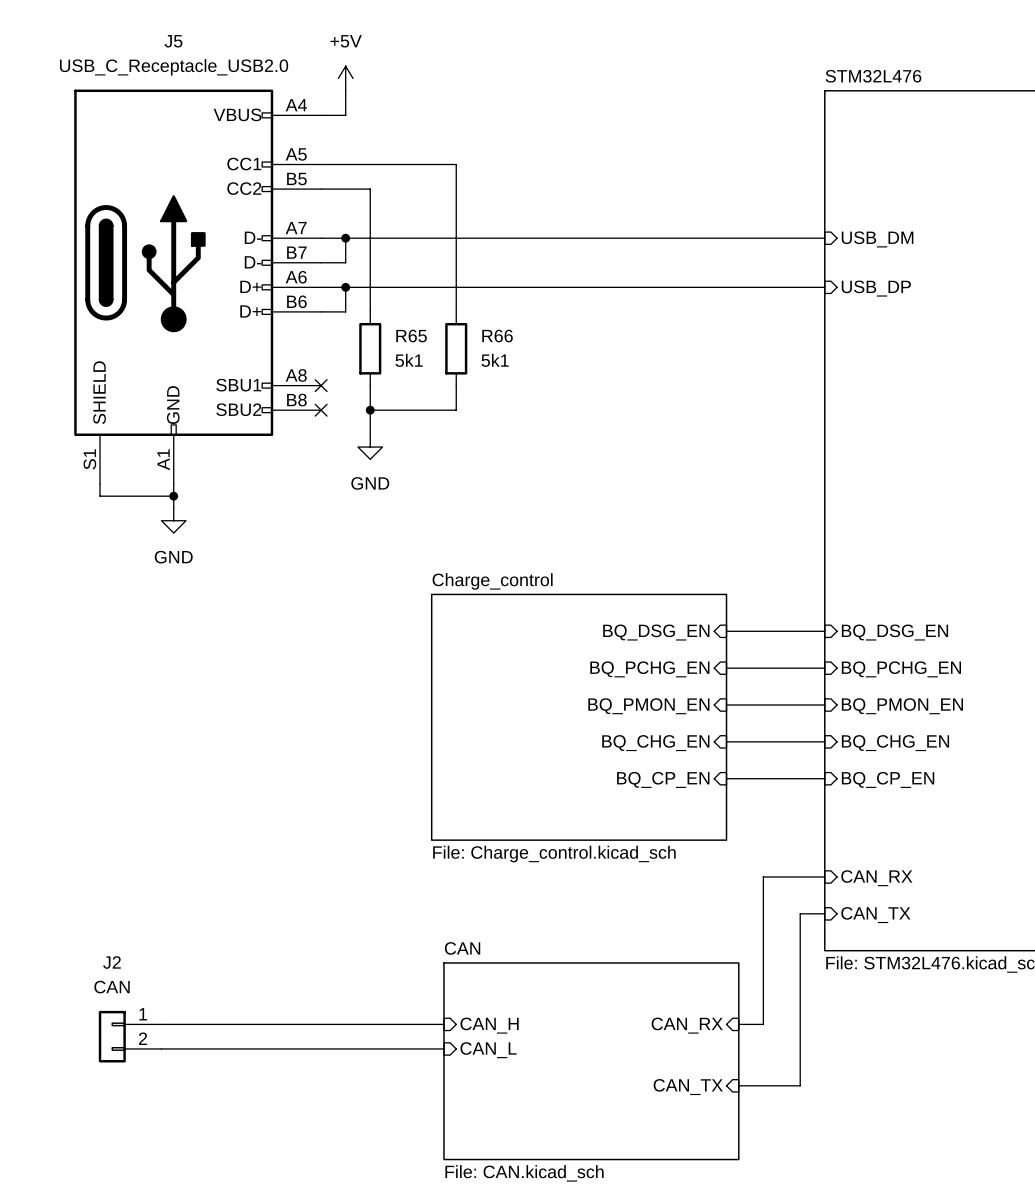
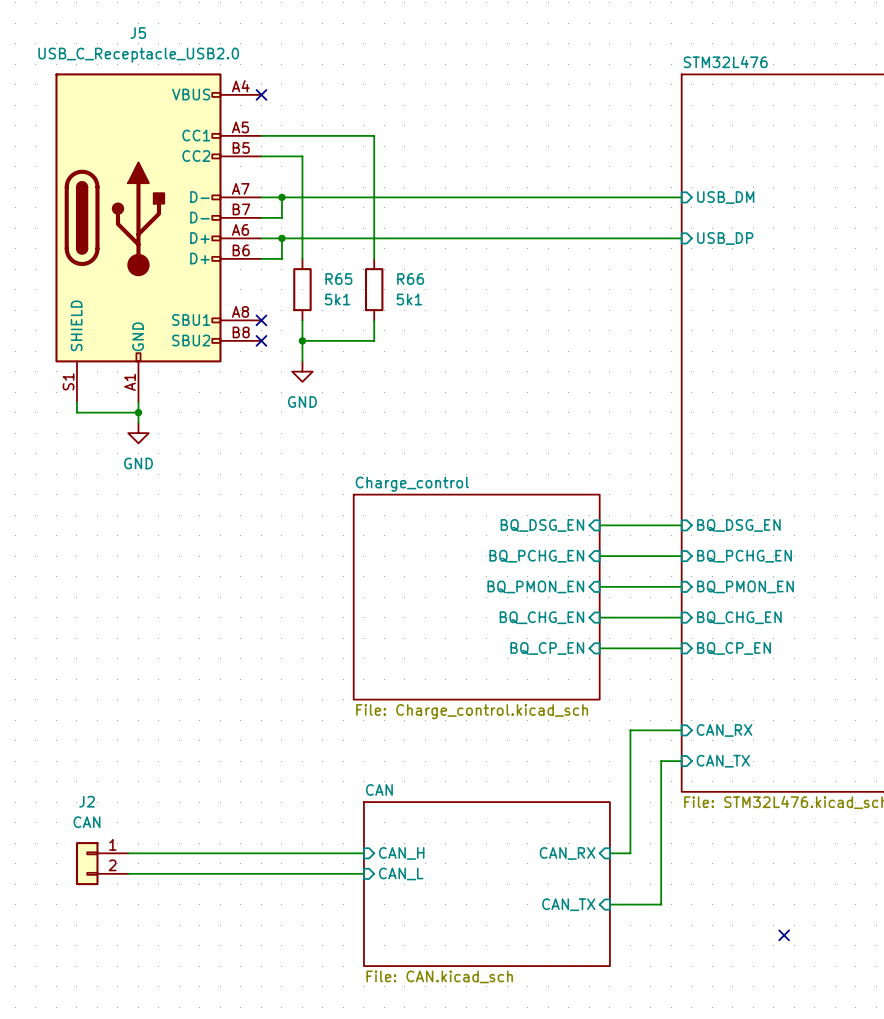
power symbol: +5V (345, 78) -> none
wire: (345, 90) (345, 115) (321, 115) -> none
no-connect mark: none -> (261, 94)
no-connect mark: none -> (784, 935)

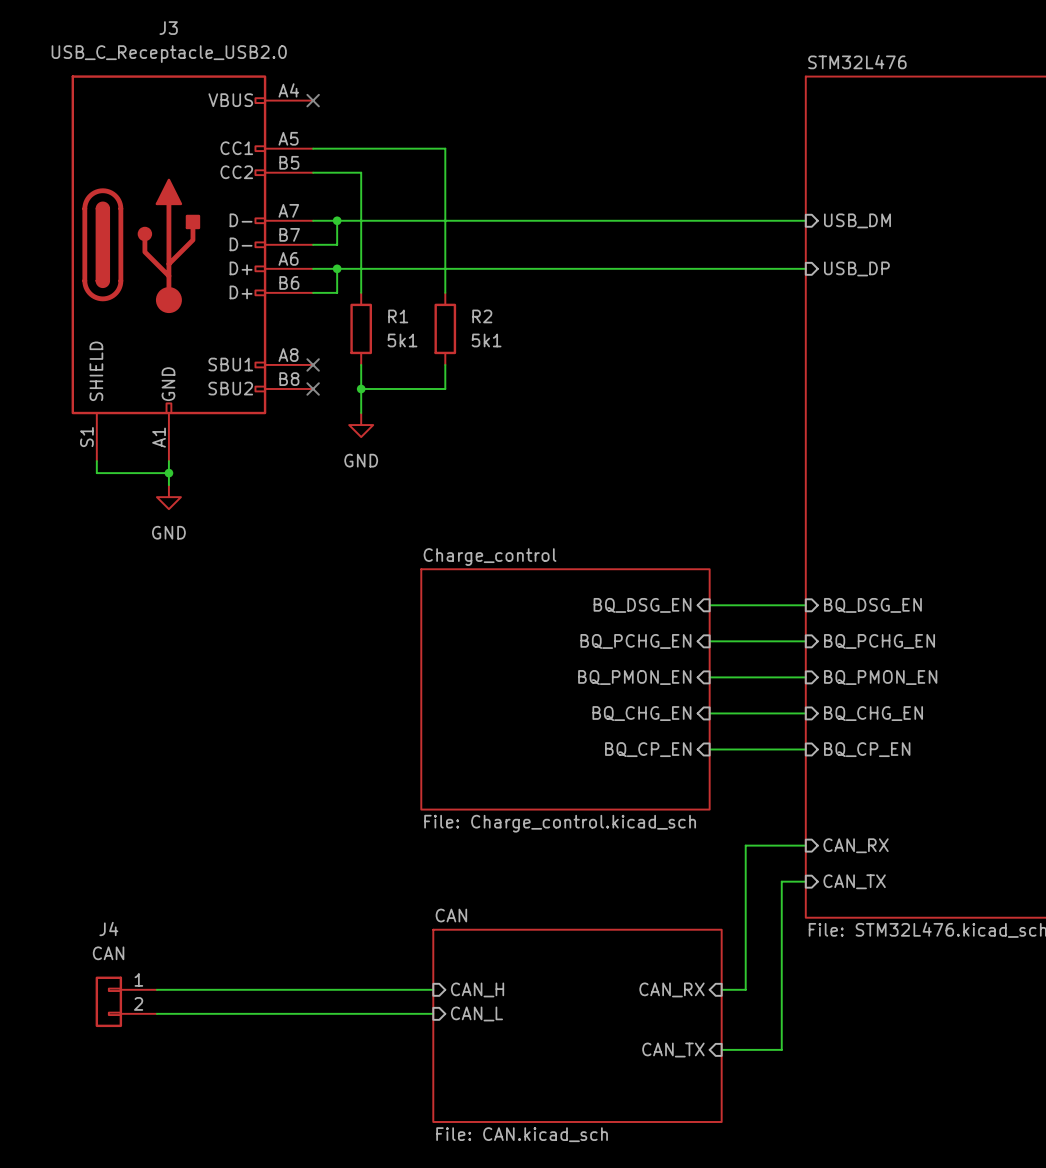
J5 name: J5 (138, 33) -> J3 (168, 28)
R65 name: R65 (338, 279) -> R1 (398, 316)
R66 name: R66 (410, 279) -> R2 (482, 316)
J2 name: J2 (86, 801) -> J4 (108, 928)
no-connect mark: (784, 935) -> none

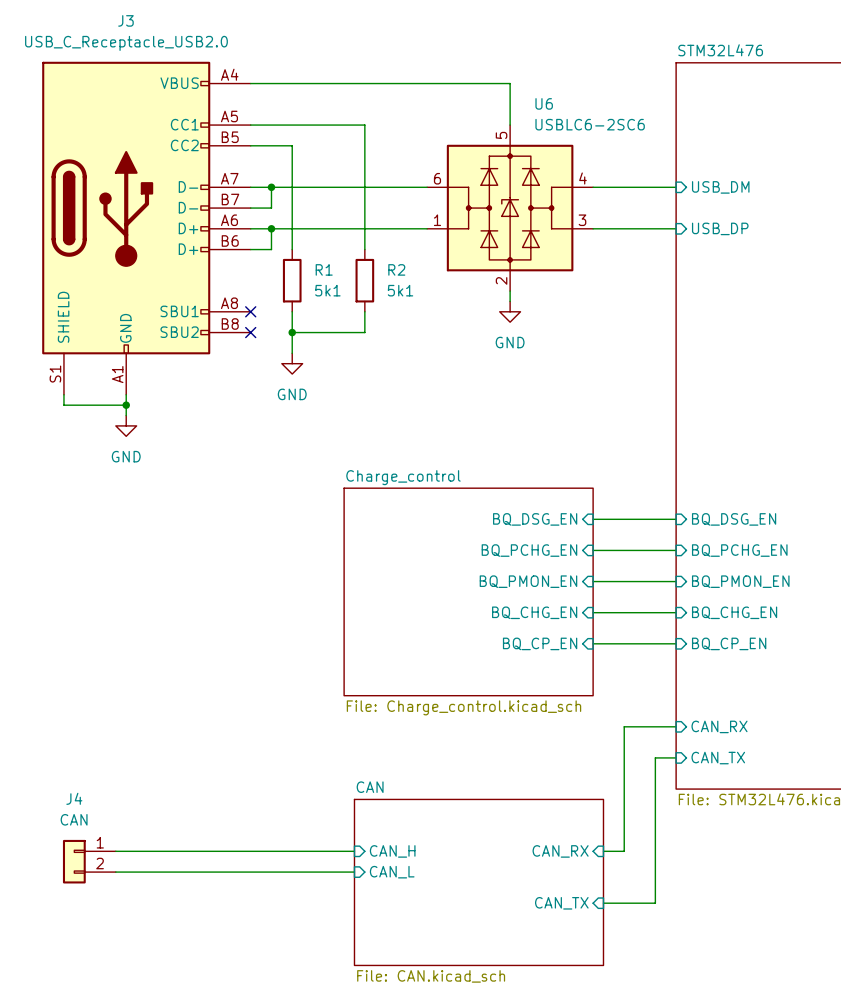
wire: none -> (250, 83) (510, 83) (510, 125)
no-connect mark: (313, 100) -> none
U6: none -> USBLC6-2SC6 (510, 208)
wire: none -> (510, 291) (510, 301)
power symbol: none -> GND (510, 311)

